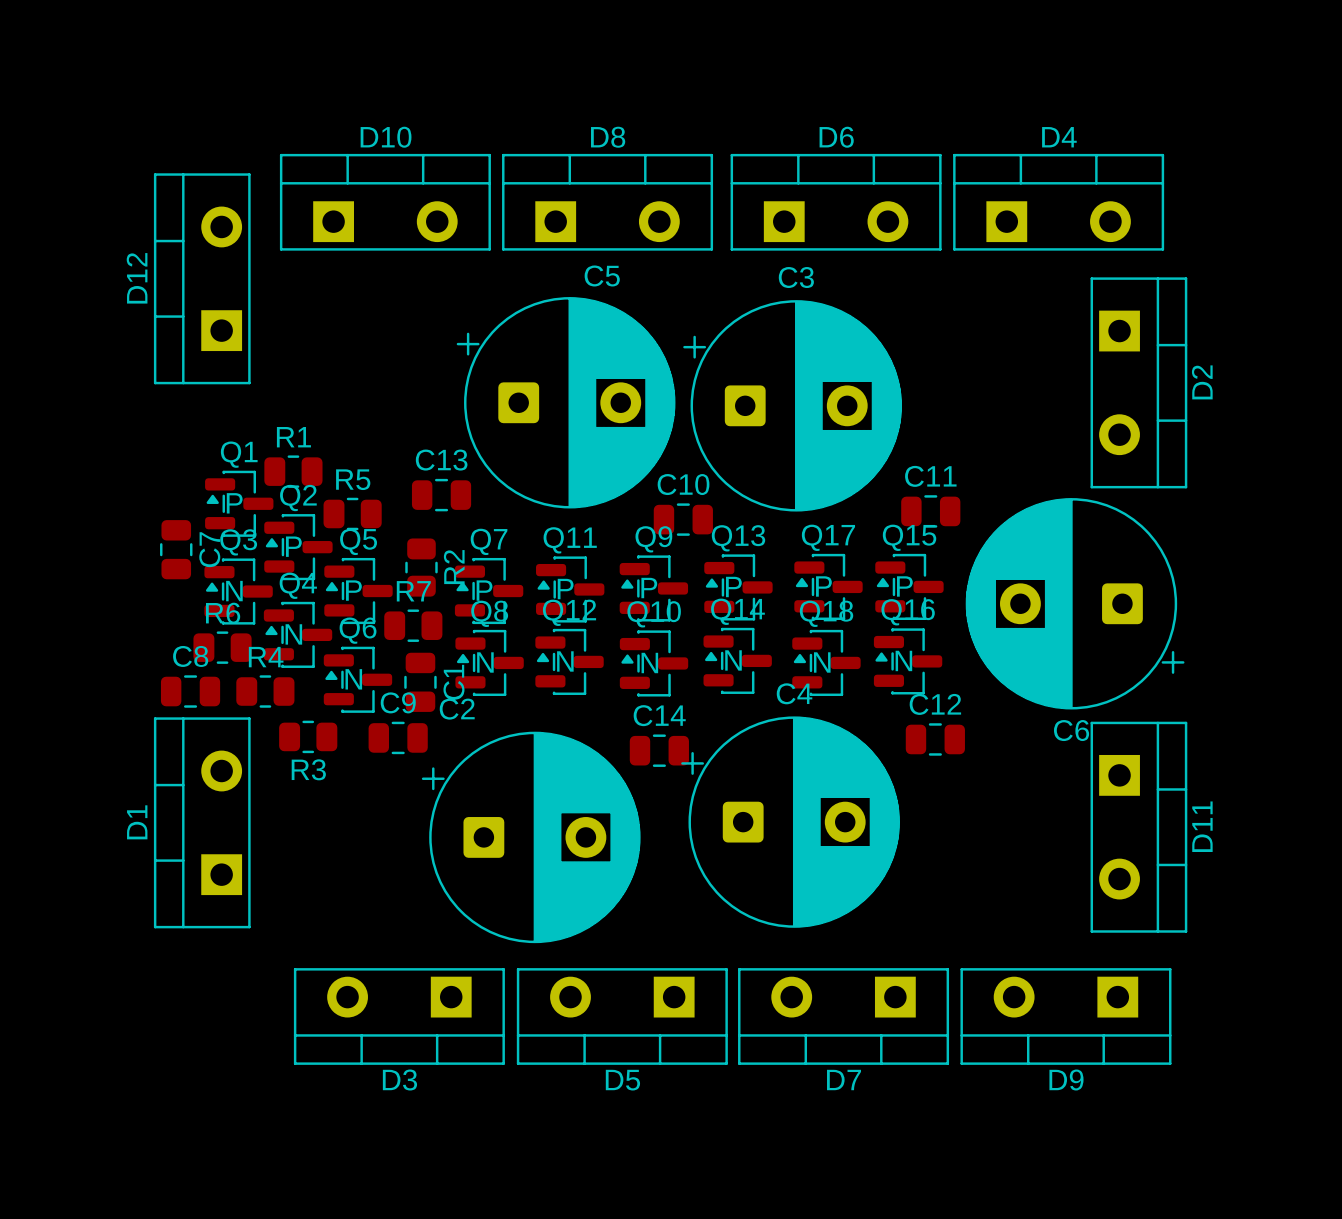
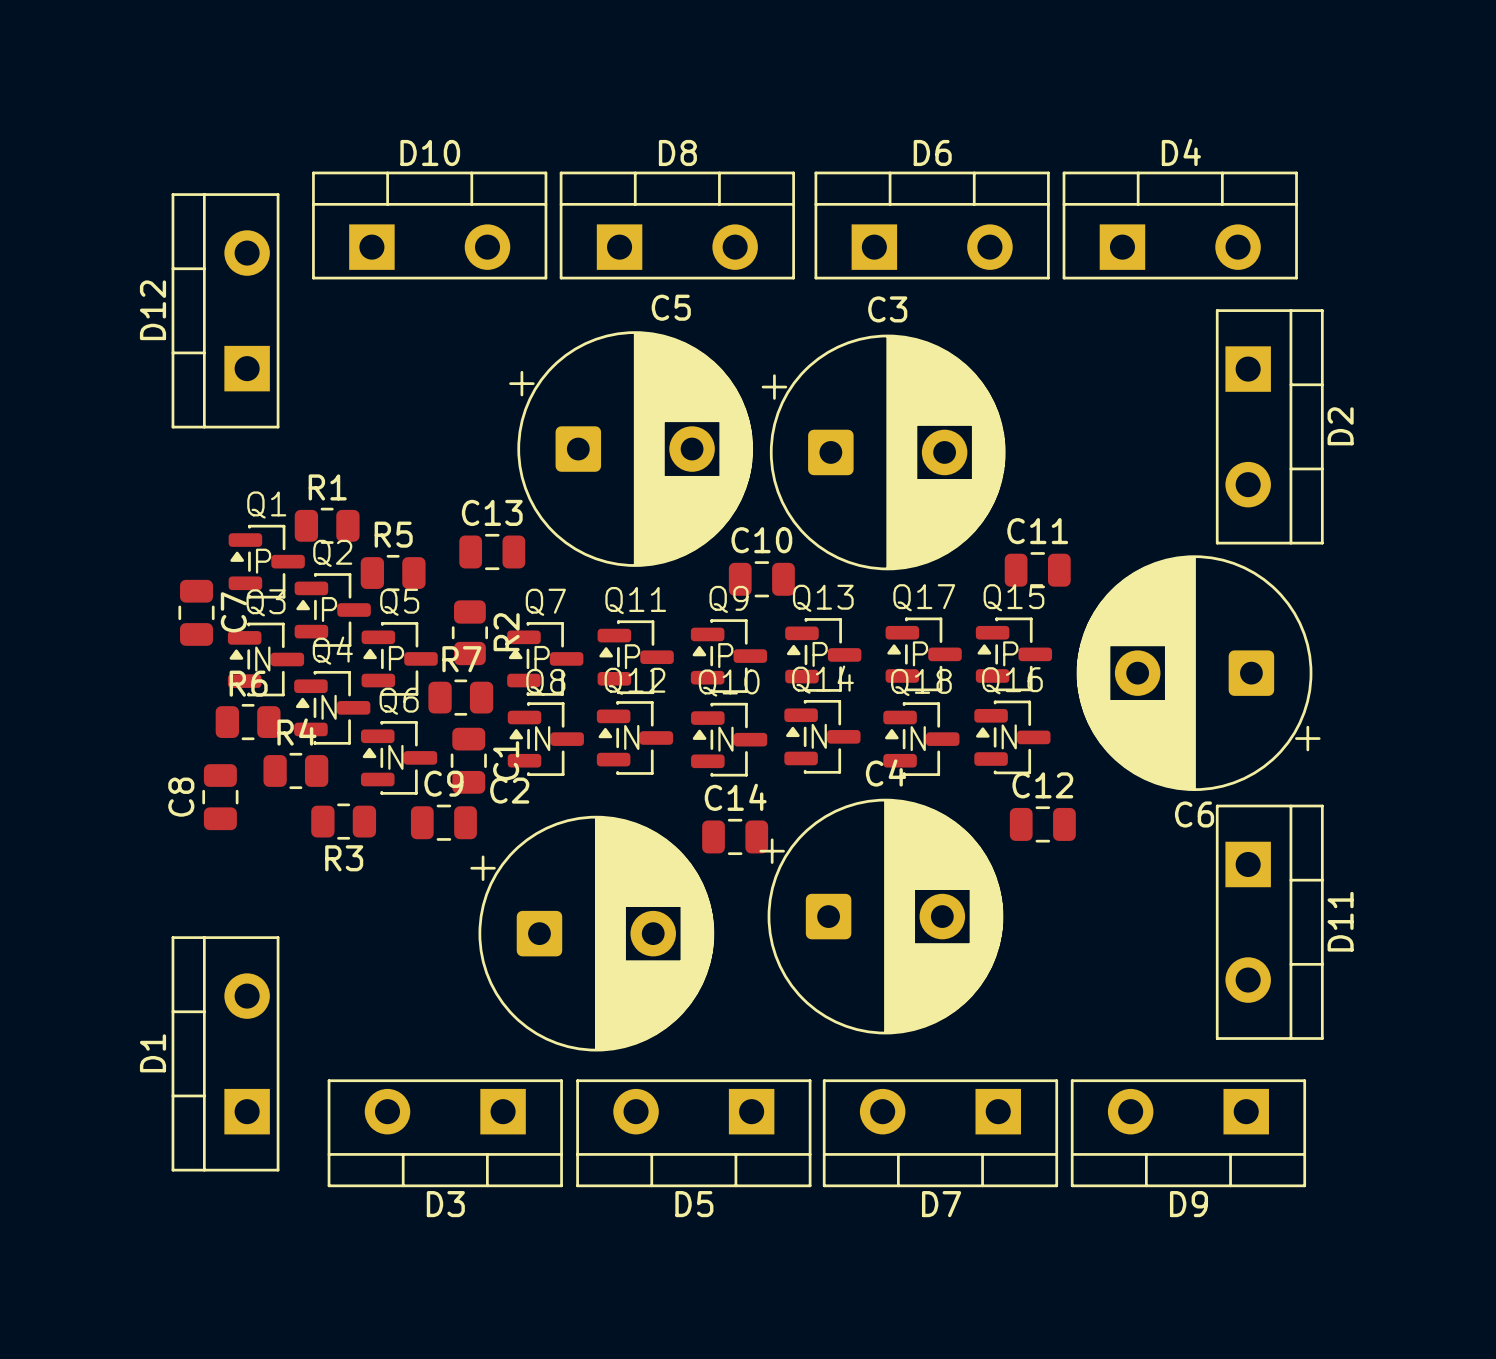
C8 name position: C8 (190, 656) -> C8 (181, 797)
C8 rotation: 0° (190, 691) -> 90° clockwise (220, 797)
D1 position: (202, 822) -> (225, 1053)

